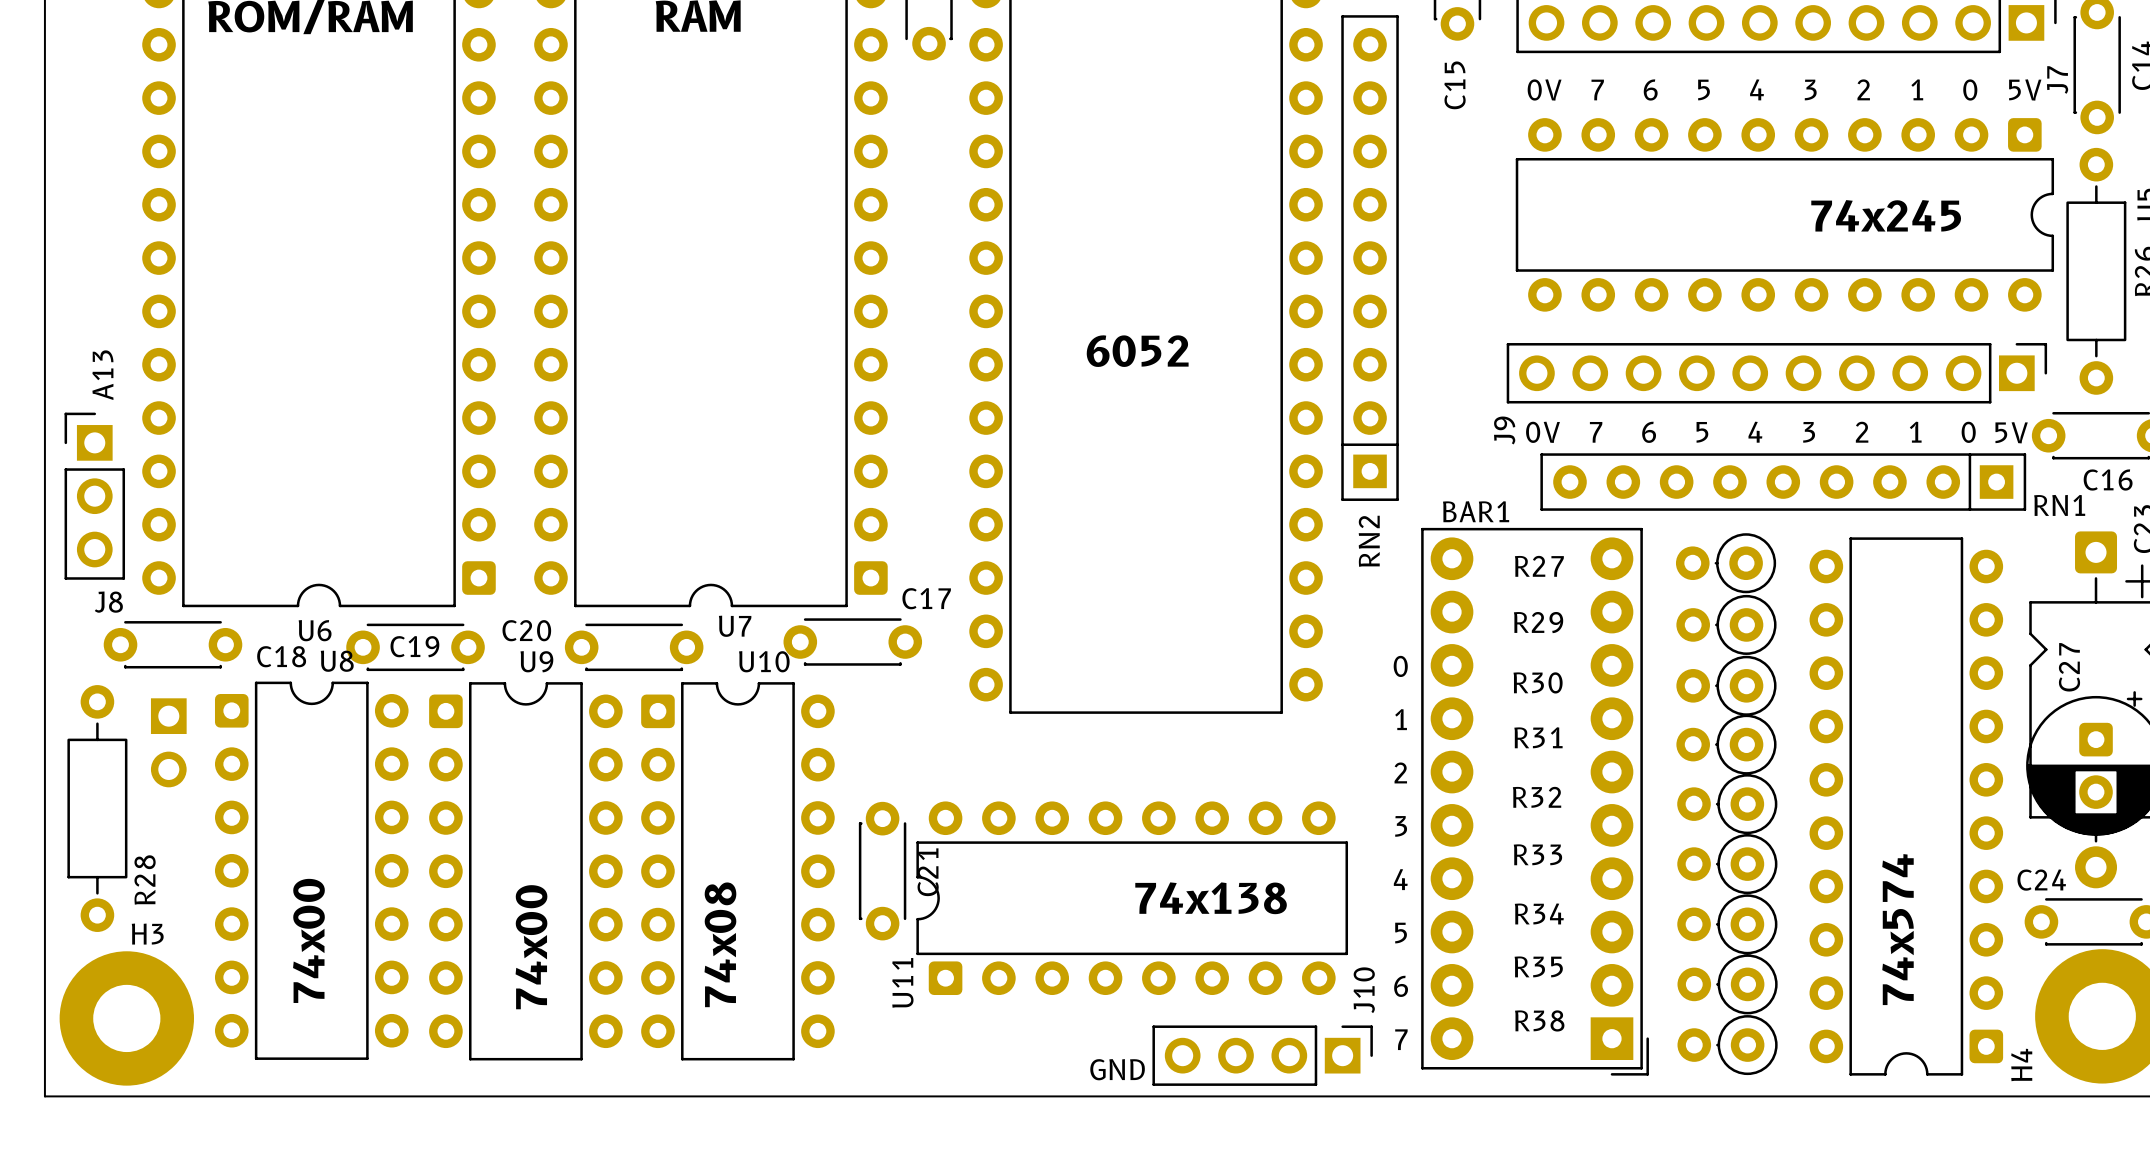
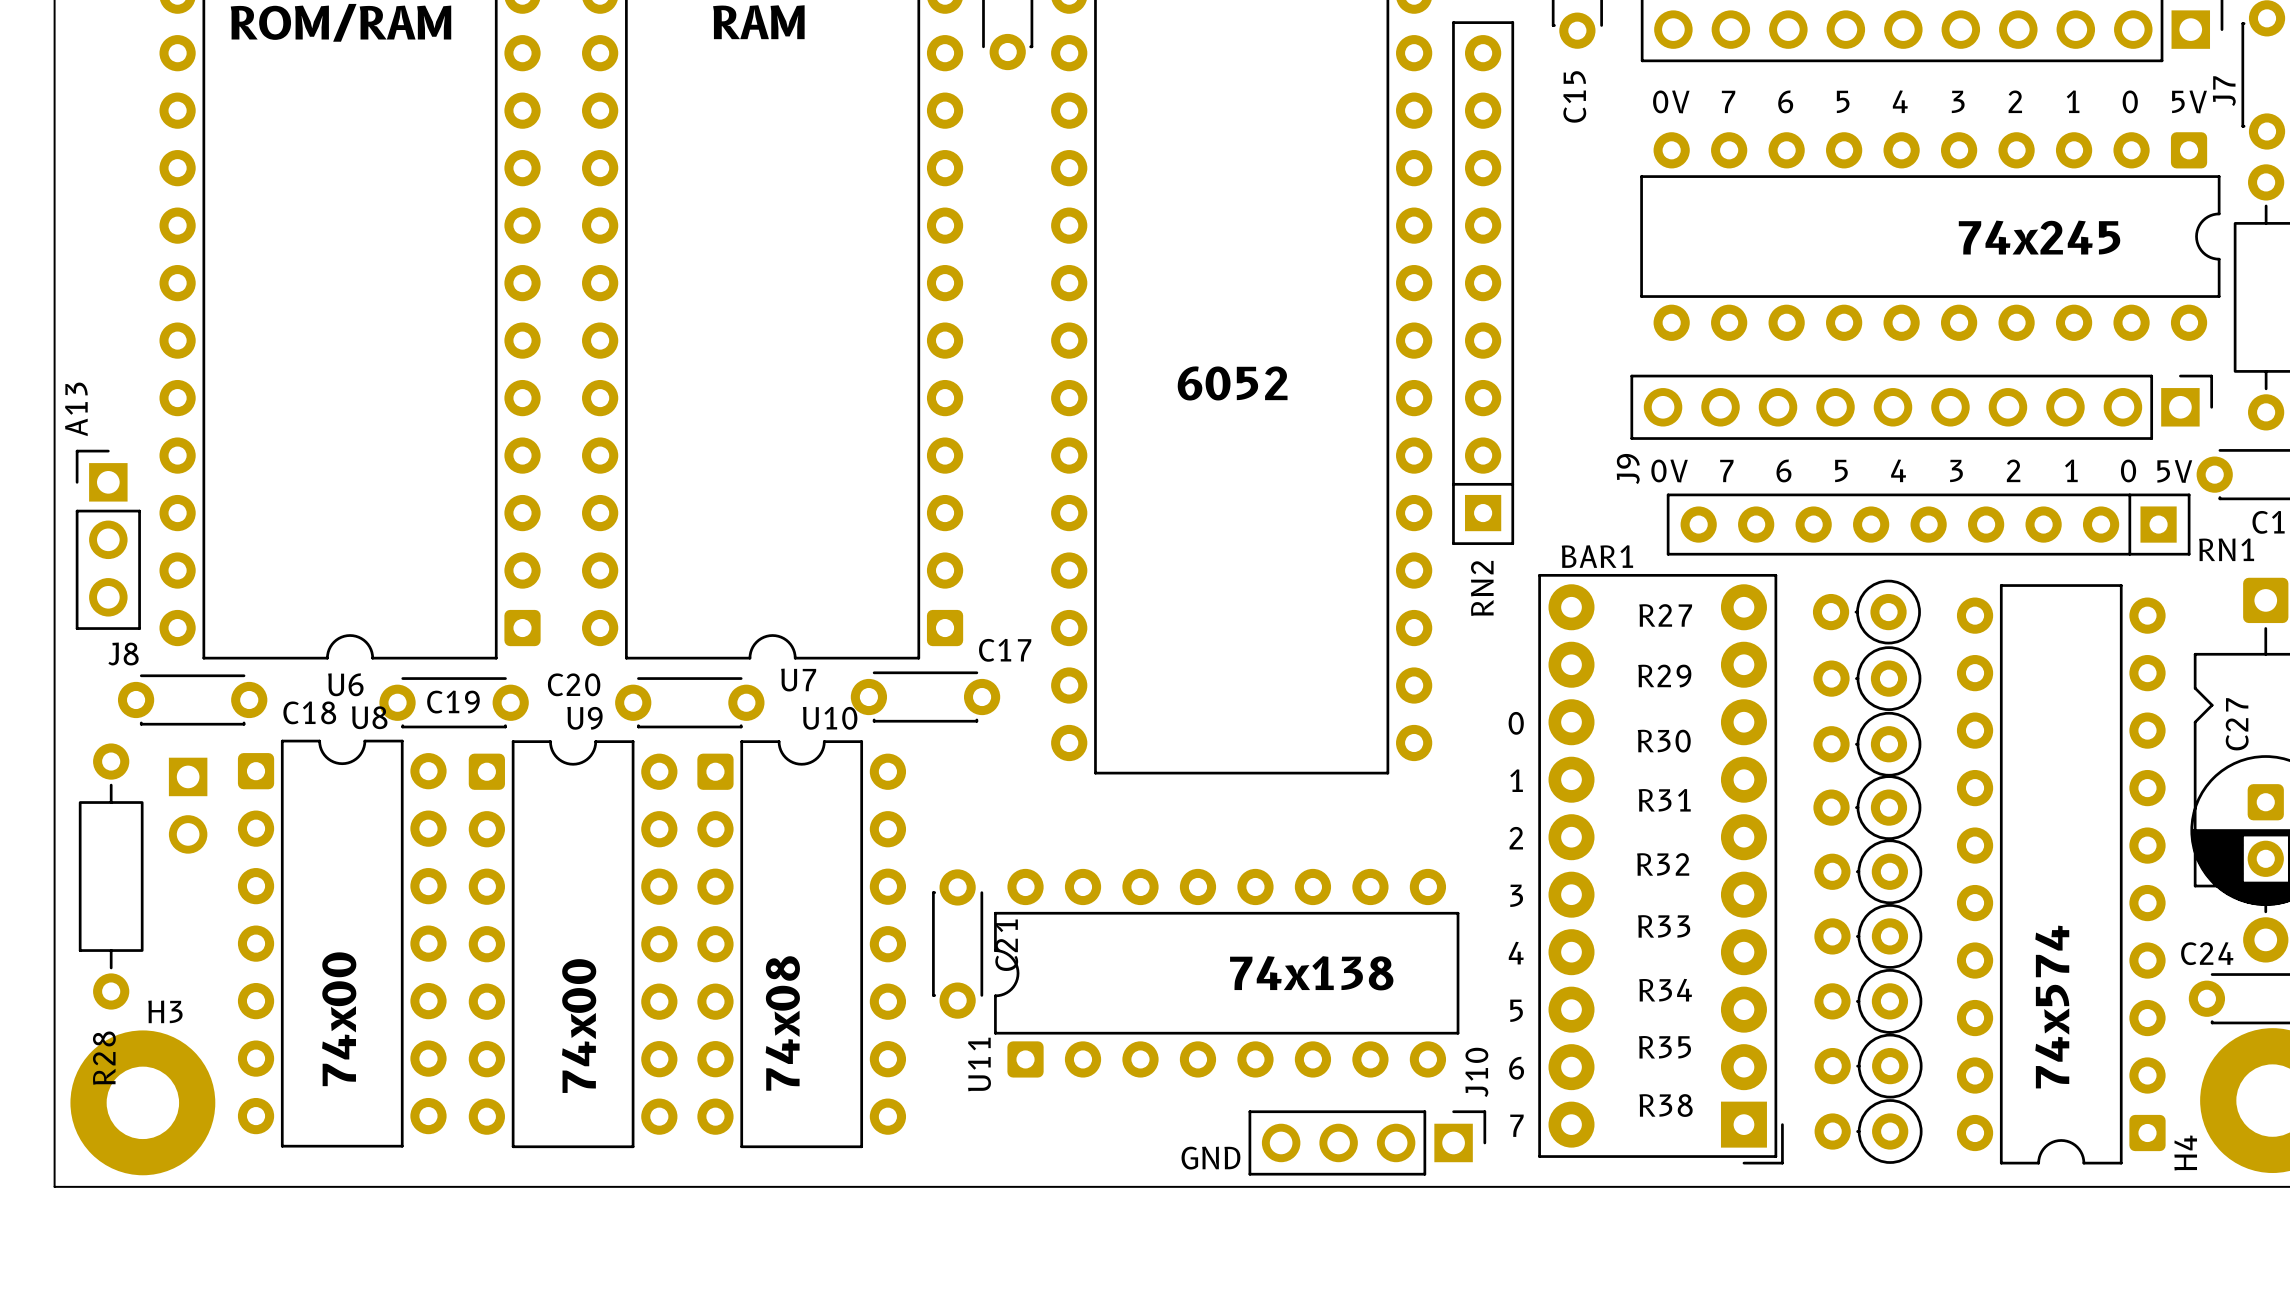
text position: A13 (102, 375) -> A13 (76, 409)
R28 name position: R28 (145, 879) -> R28 (104, 1058)

